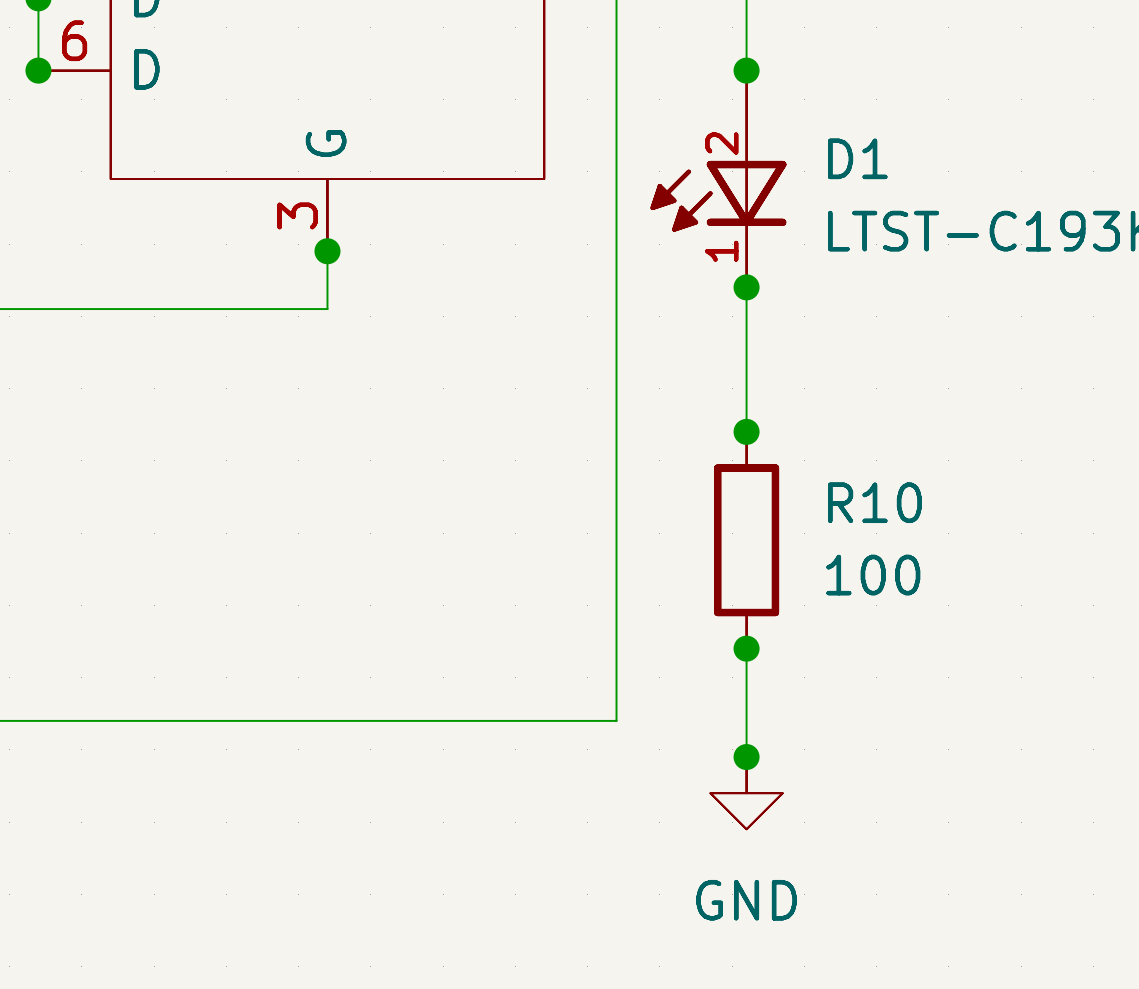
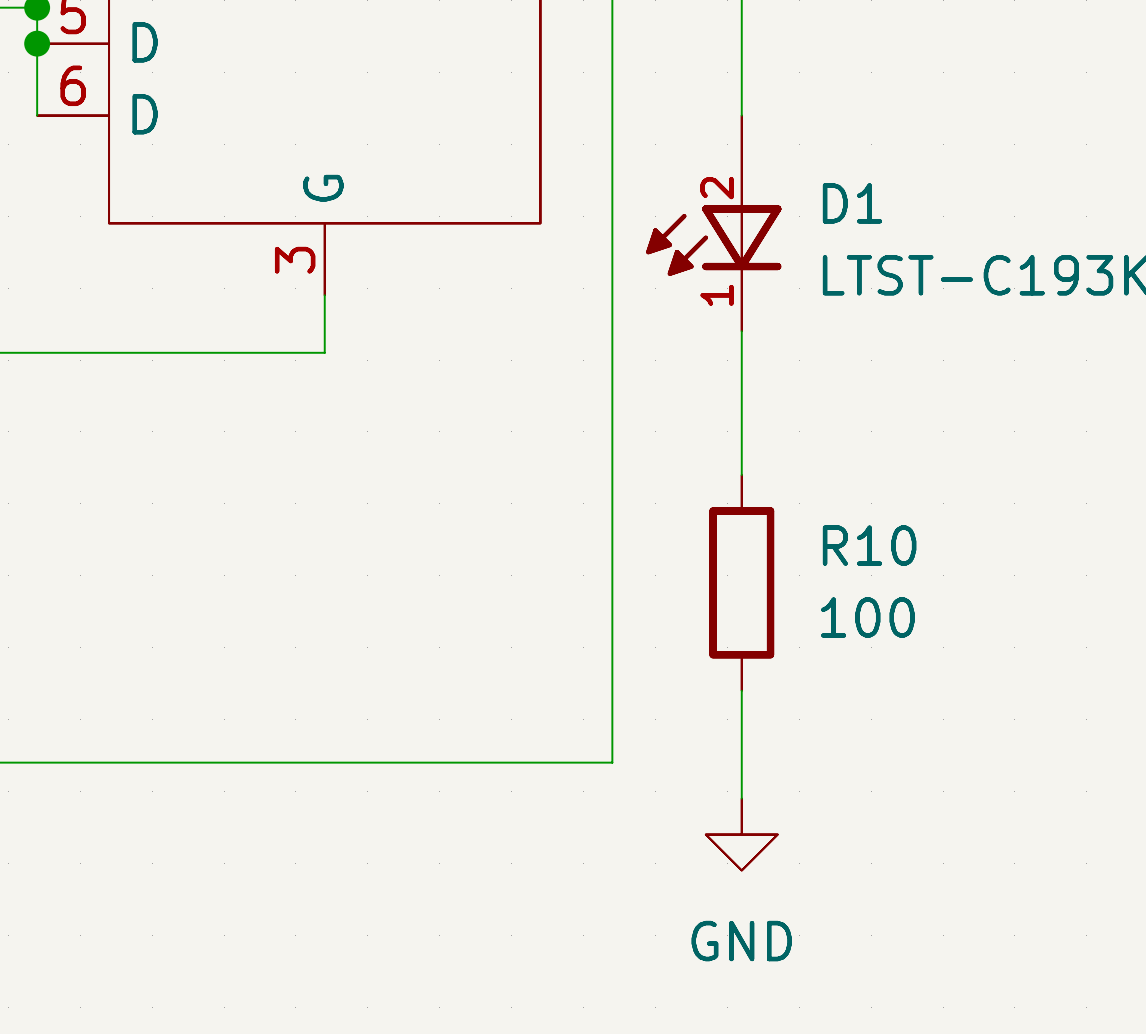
junction: (38, 70) -> none
junction: (746, 70) -> none
junction: (327, 251) -> none
junction: (746, 287) -> none
junction: (746, 431) -> none
junction: (746, 648) -> none
junction: (746, 757) -> none

